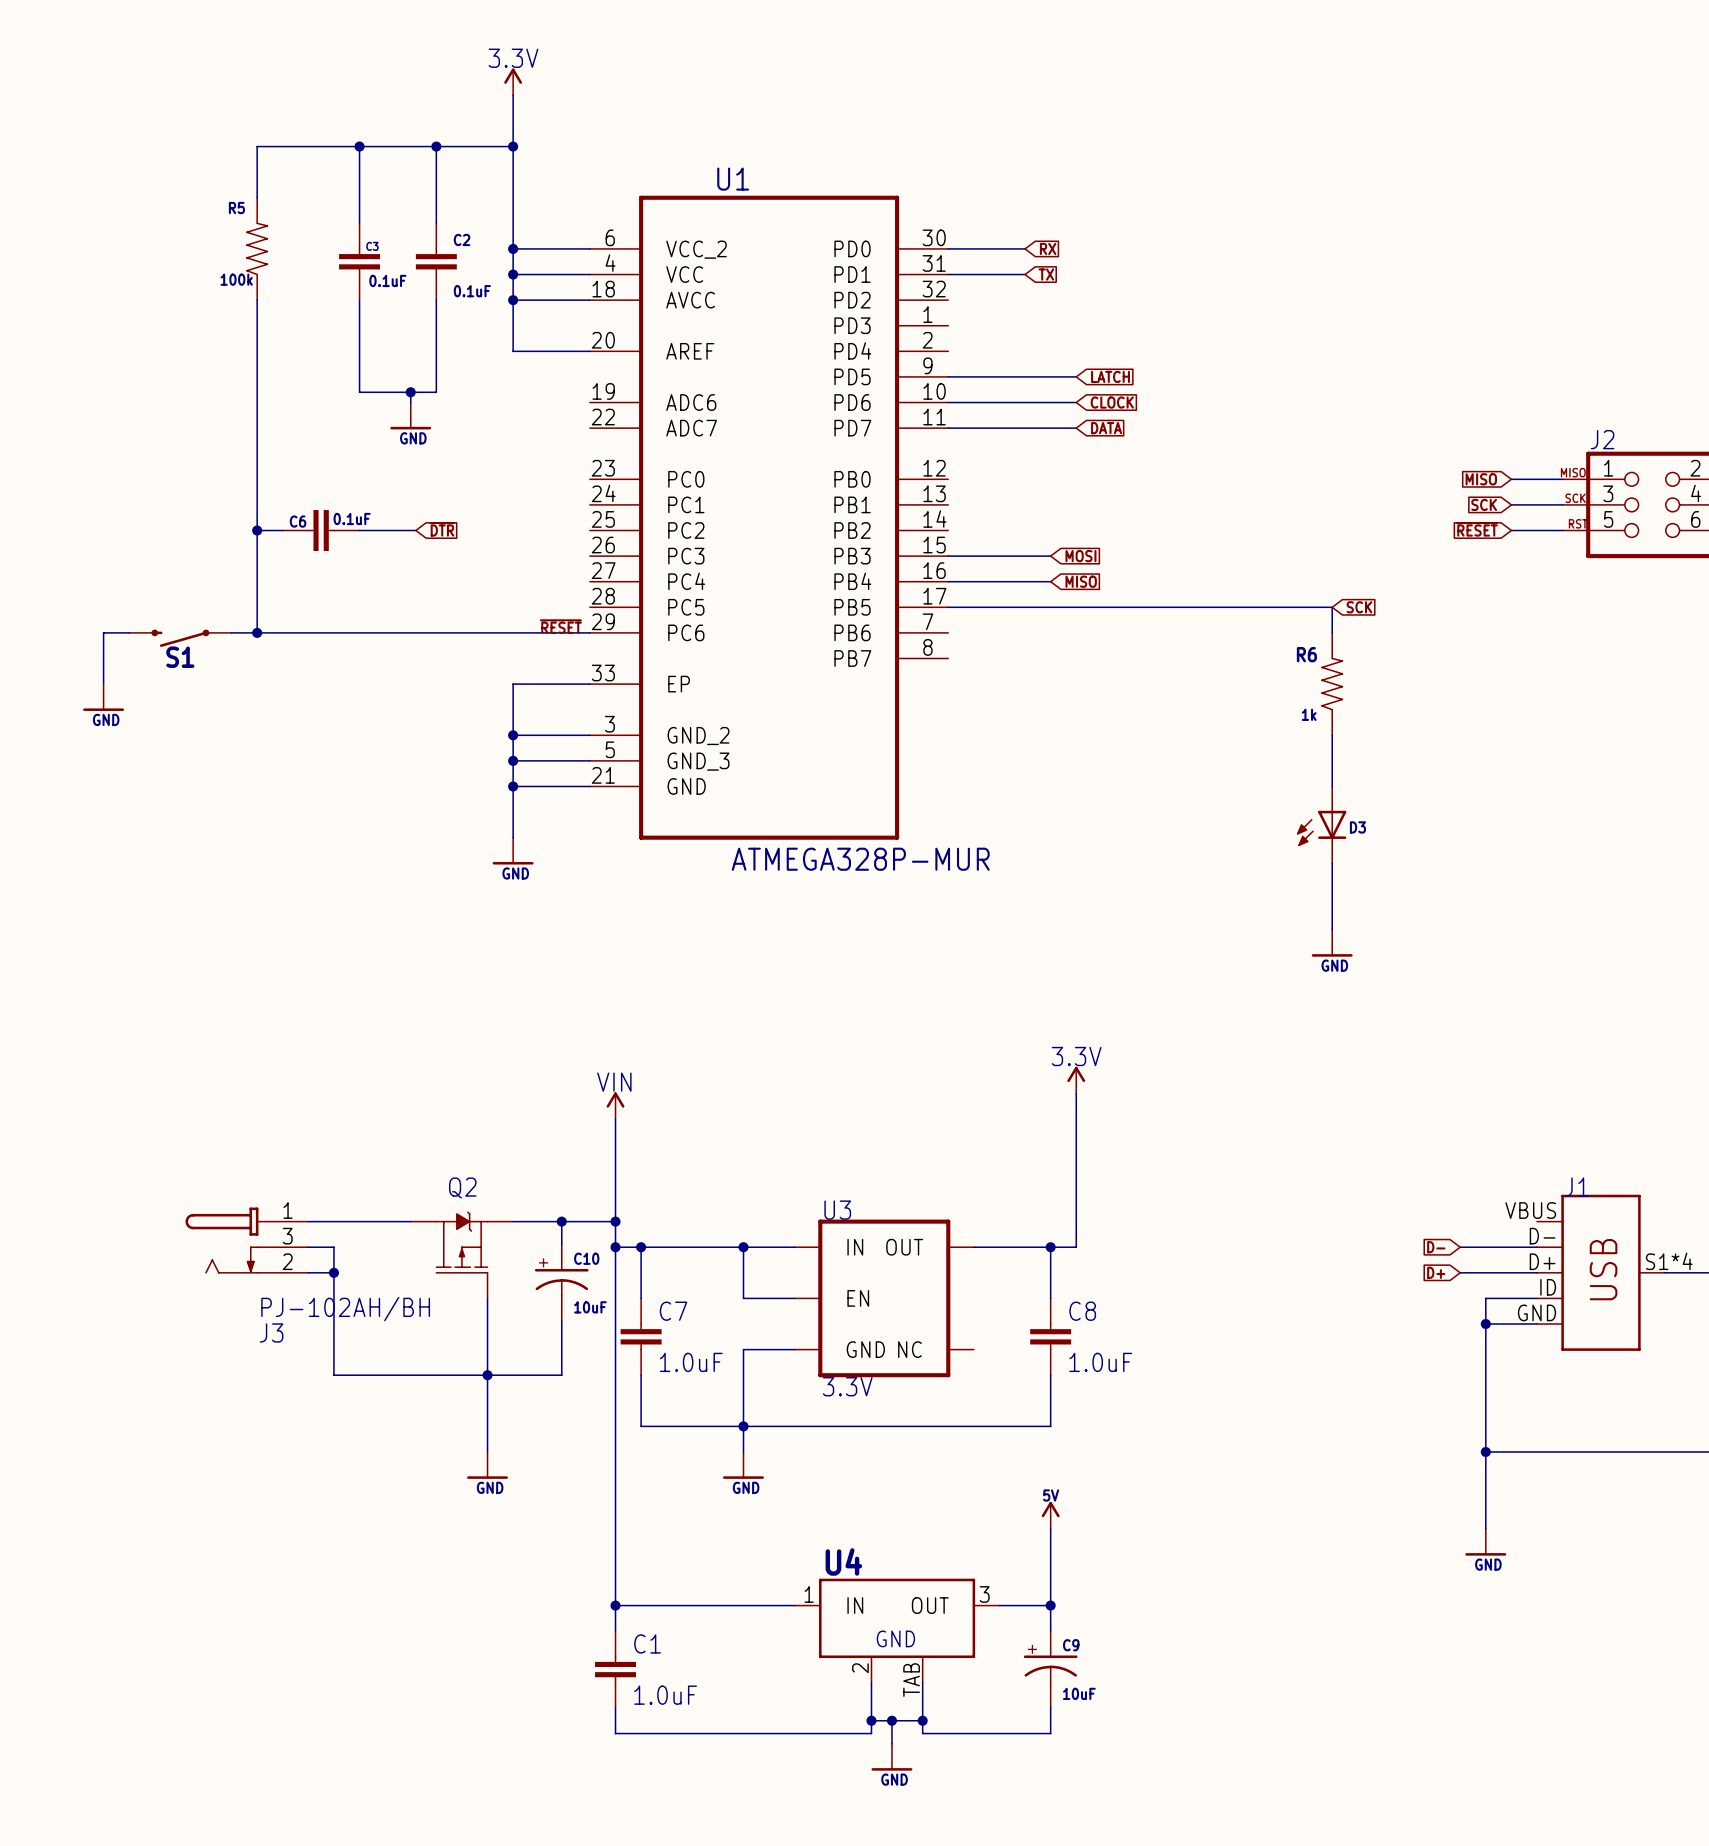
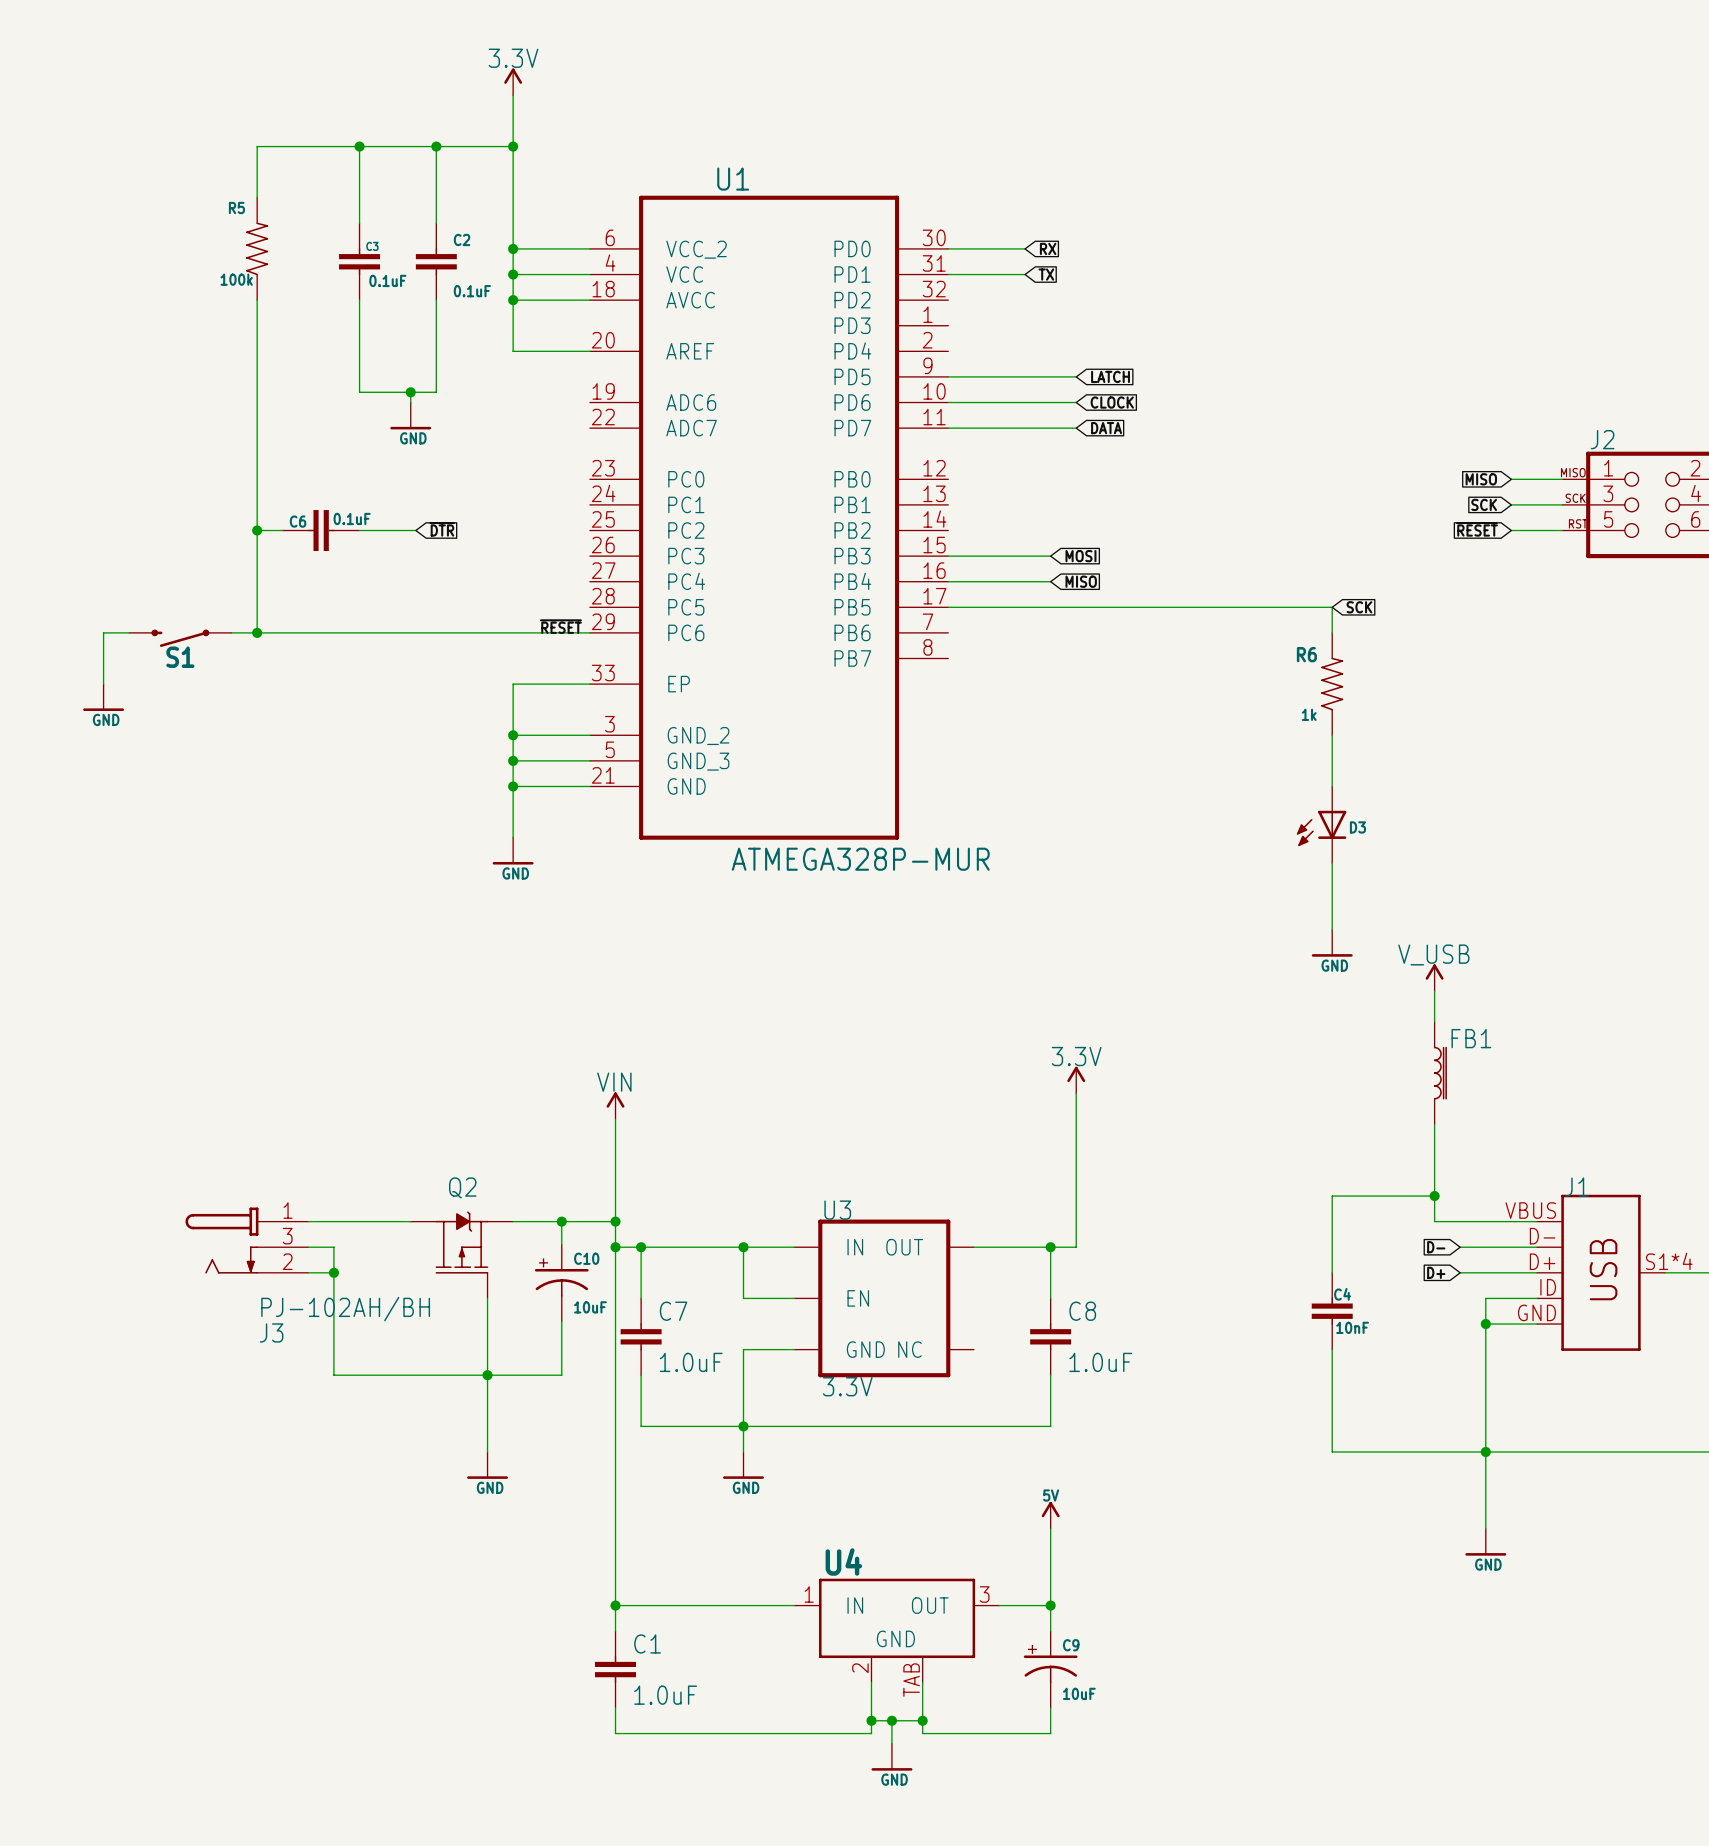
power symbol: none -> V_USB (1434, 977)
wire: none -> (1434, 991) (1434, 1021)
FB1: none -> (1440, 1073)
wire: none -> (1434, 1124) (1434, 1221) (1537, 1221)
wire: none -> (1434, 1196) (1332, 1196) (1332, 1272)
junction: none -> (1434, 1196)
C4: none -> 10nF (1332, 1311)
wire: none -> (1332, 1349) (1332, 1451) (1485, 1451)

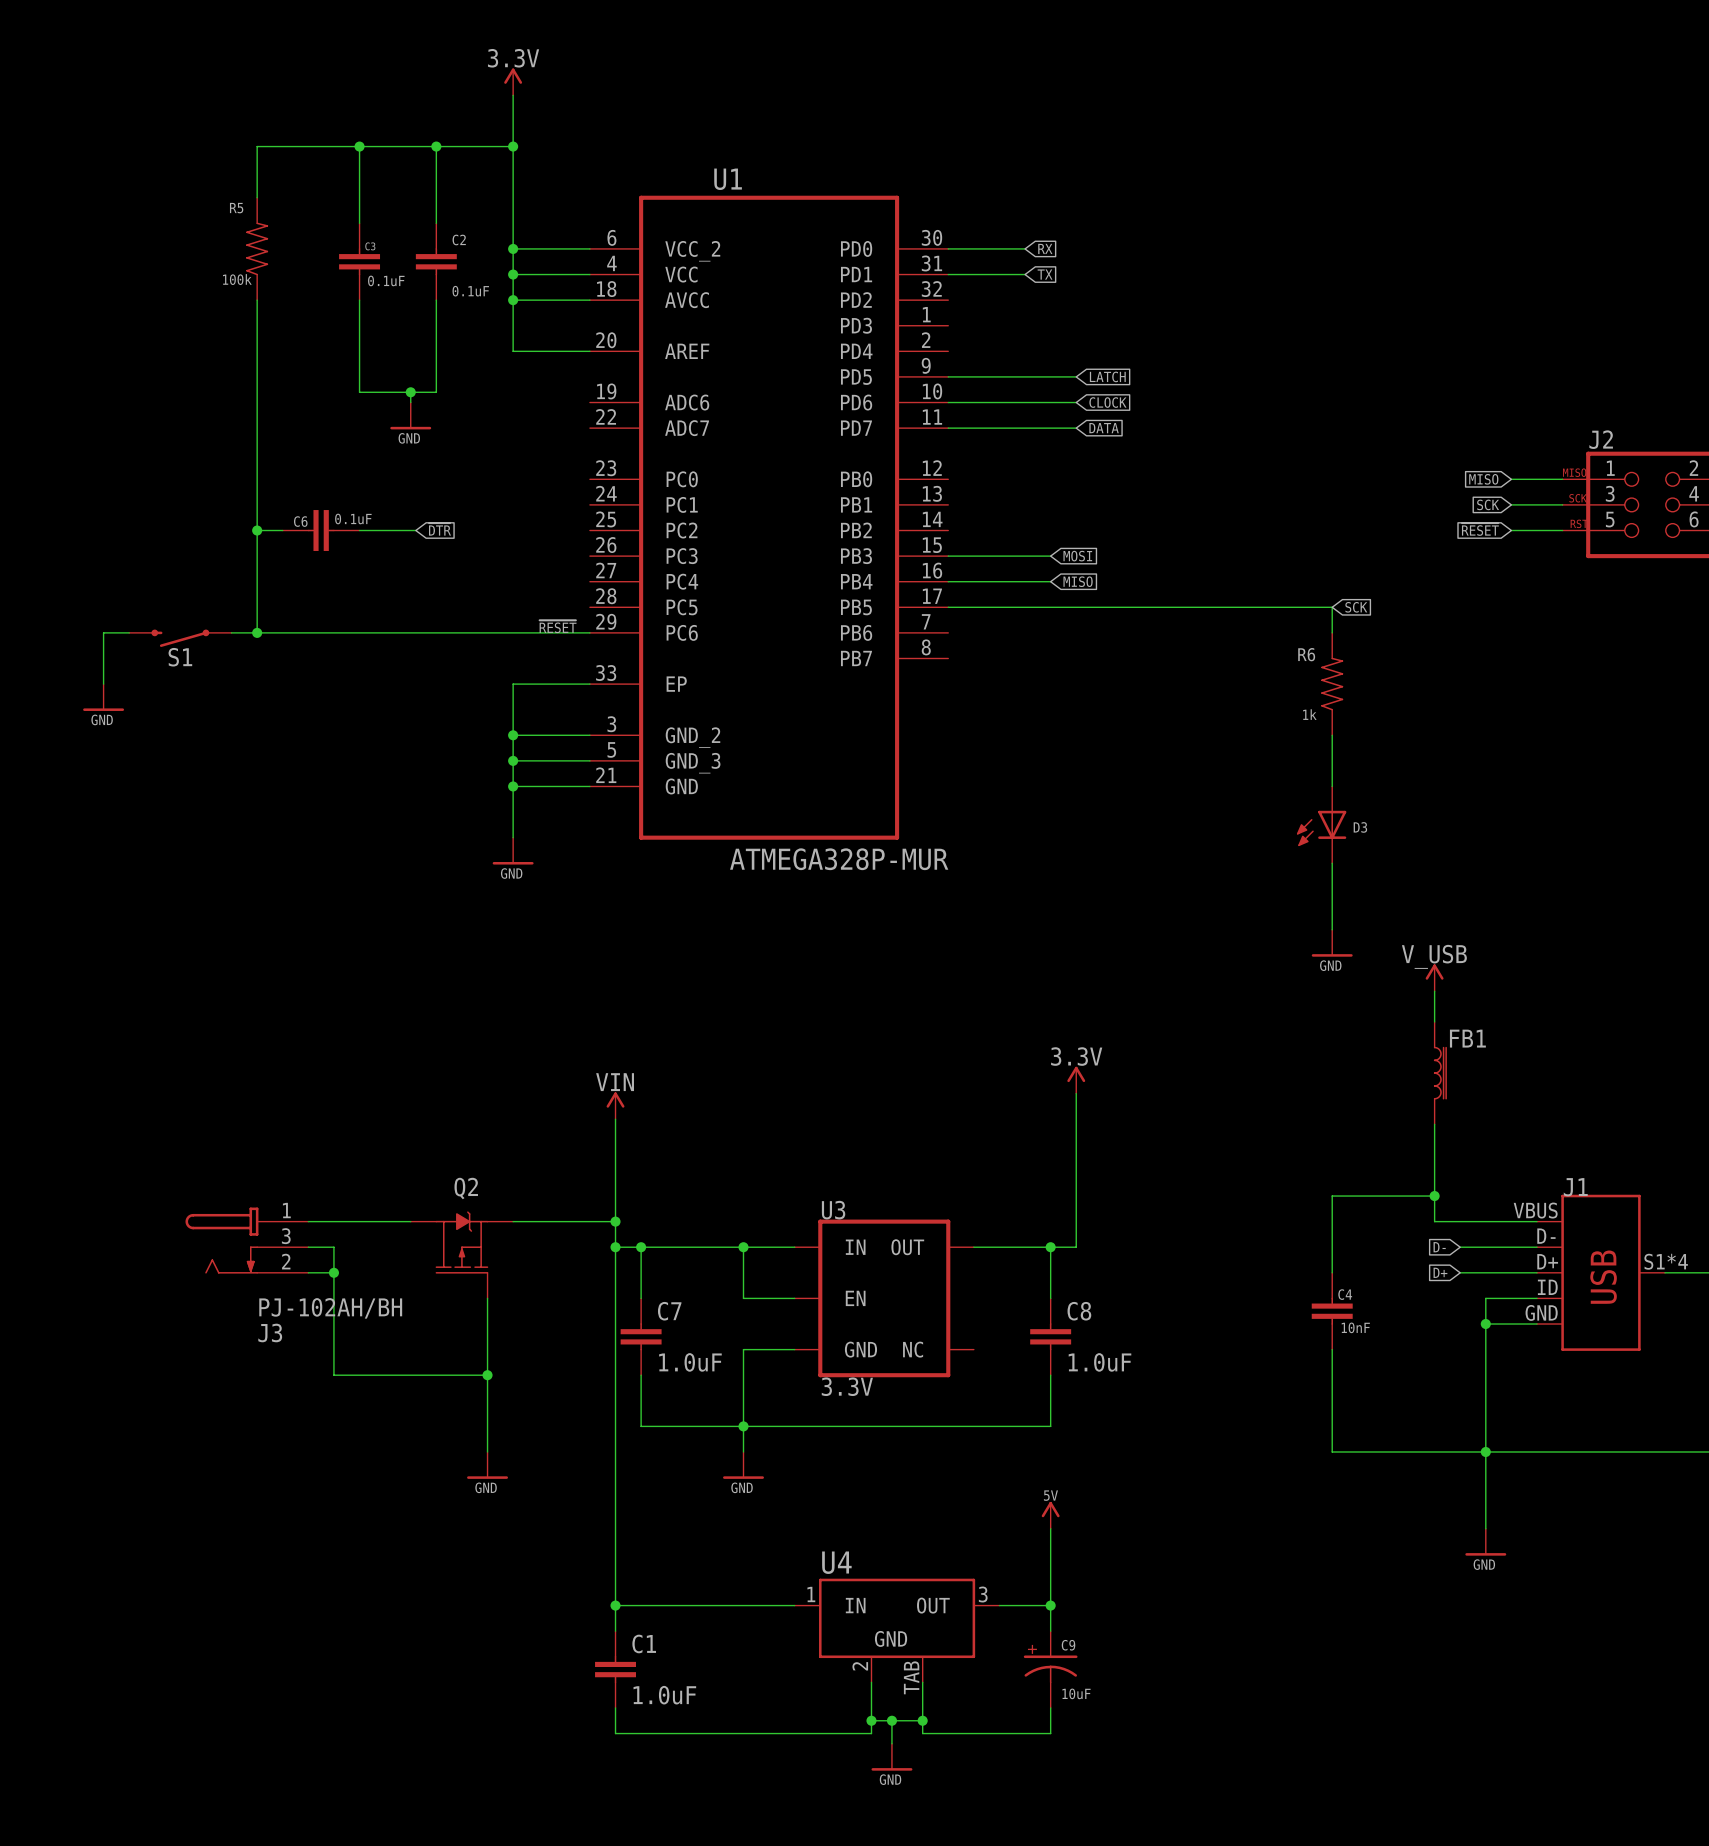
wire: (561, 1221) (561, 1244) -> none
junction: (561, 1221) -> none
C10: 10uF (561, 1283) -> none
wire: (561, 1321) (561, 1375) (487, 1375) -> none

